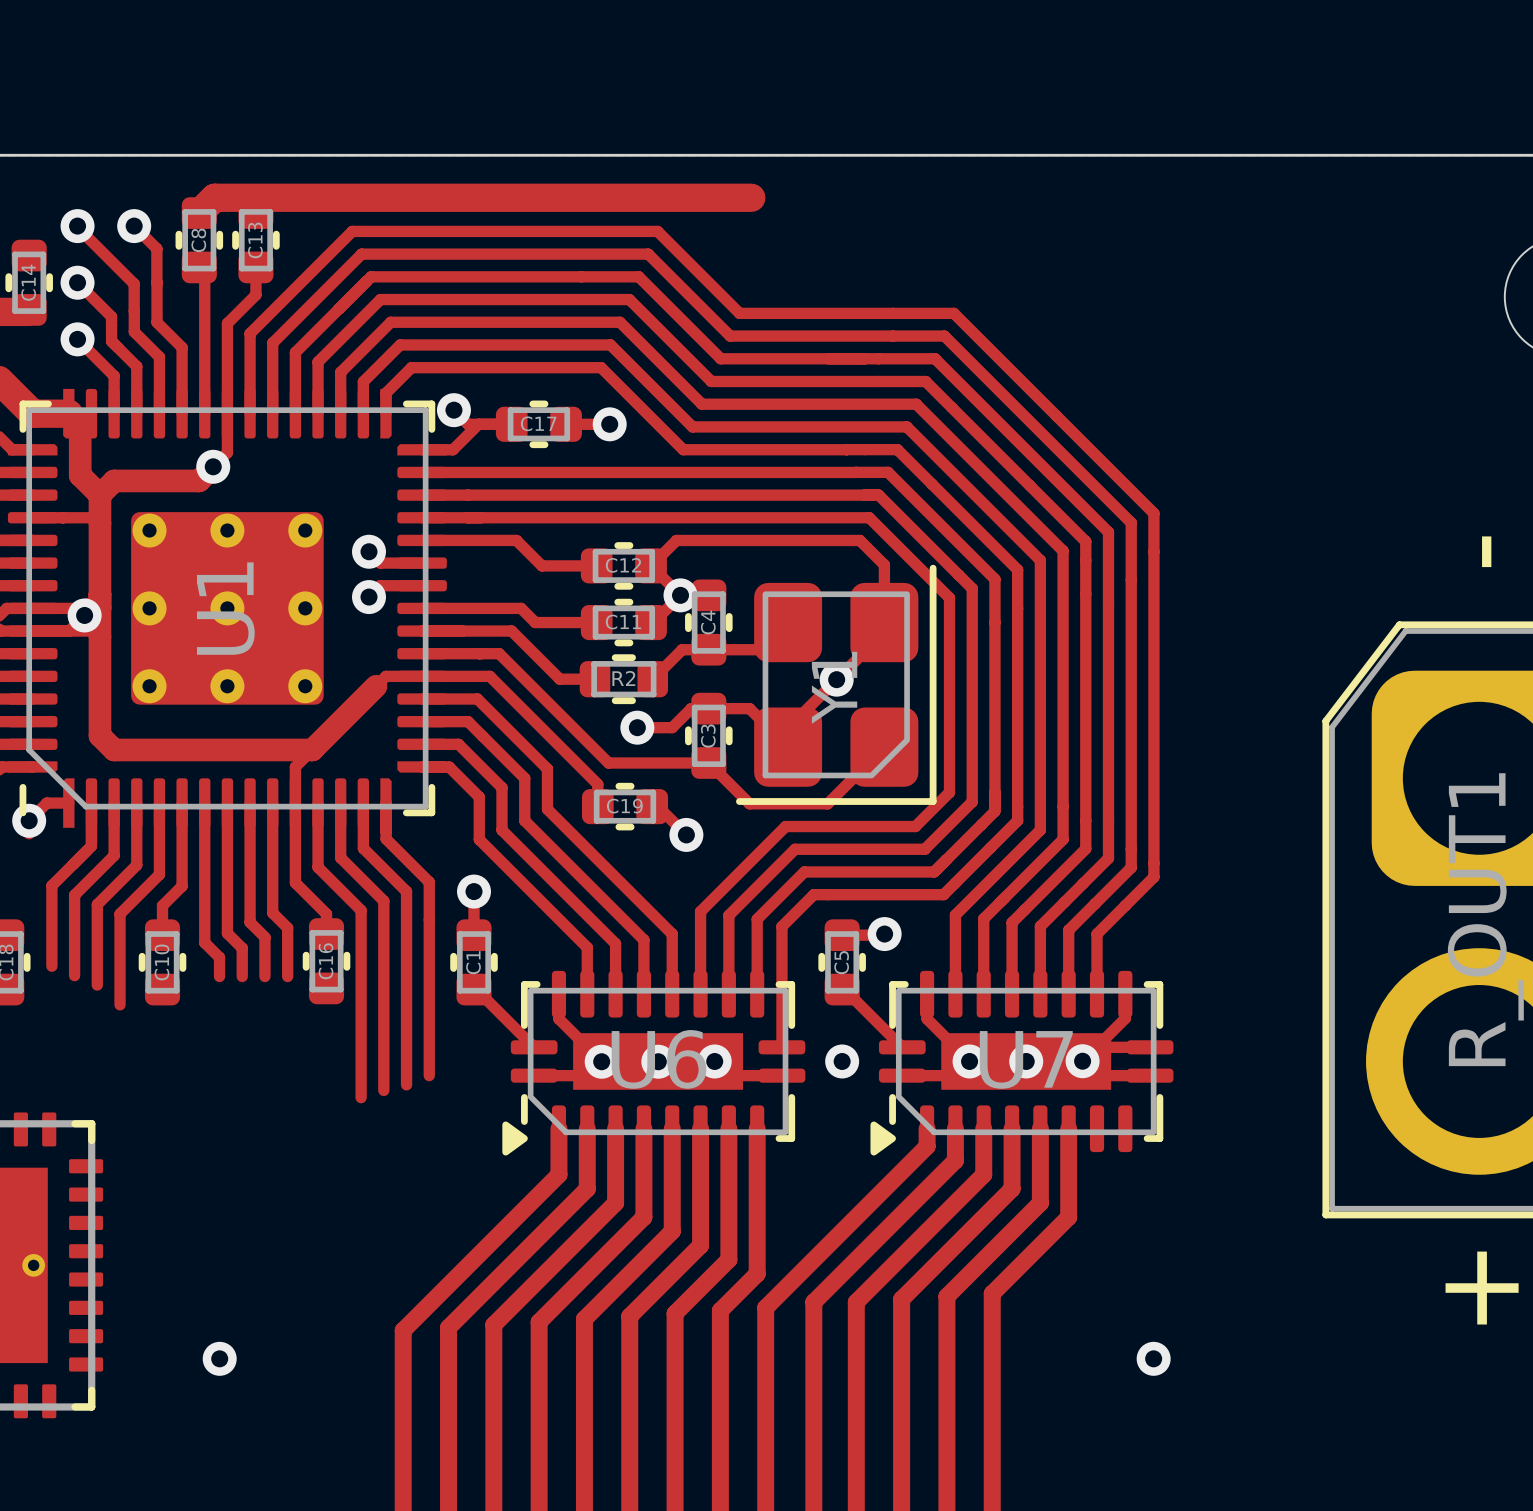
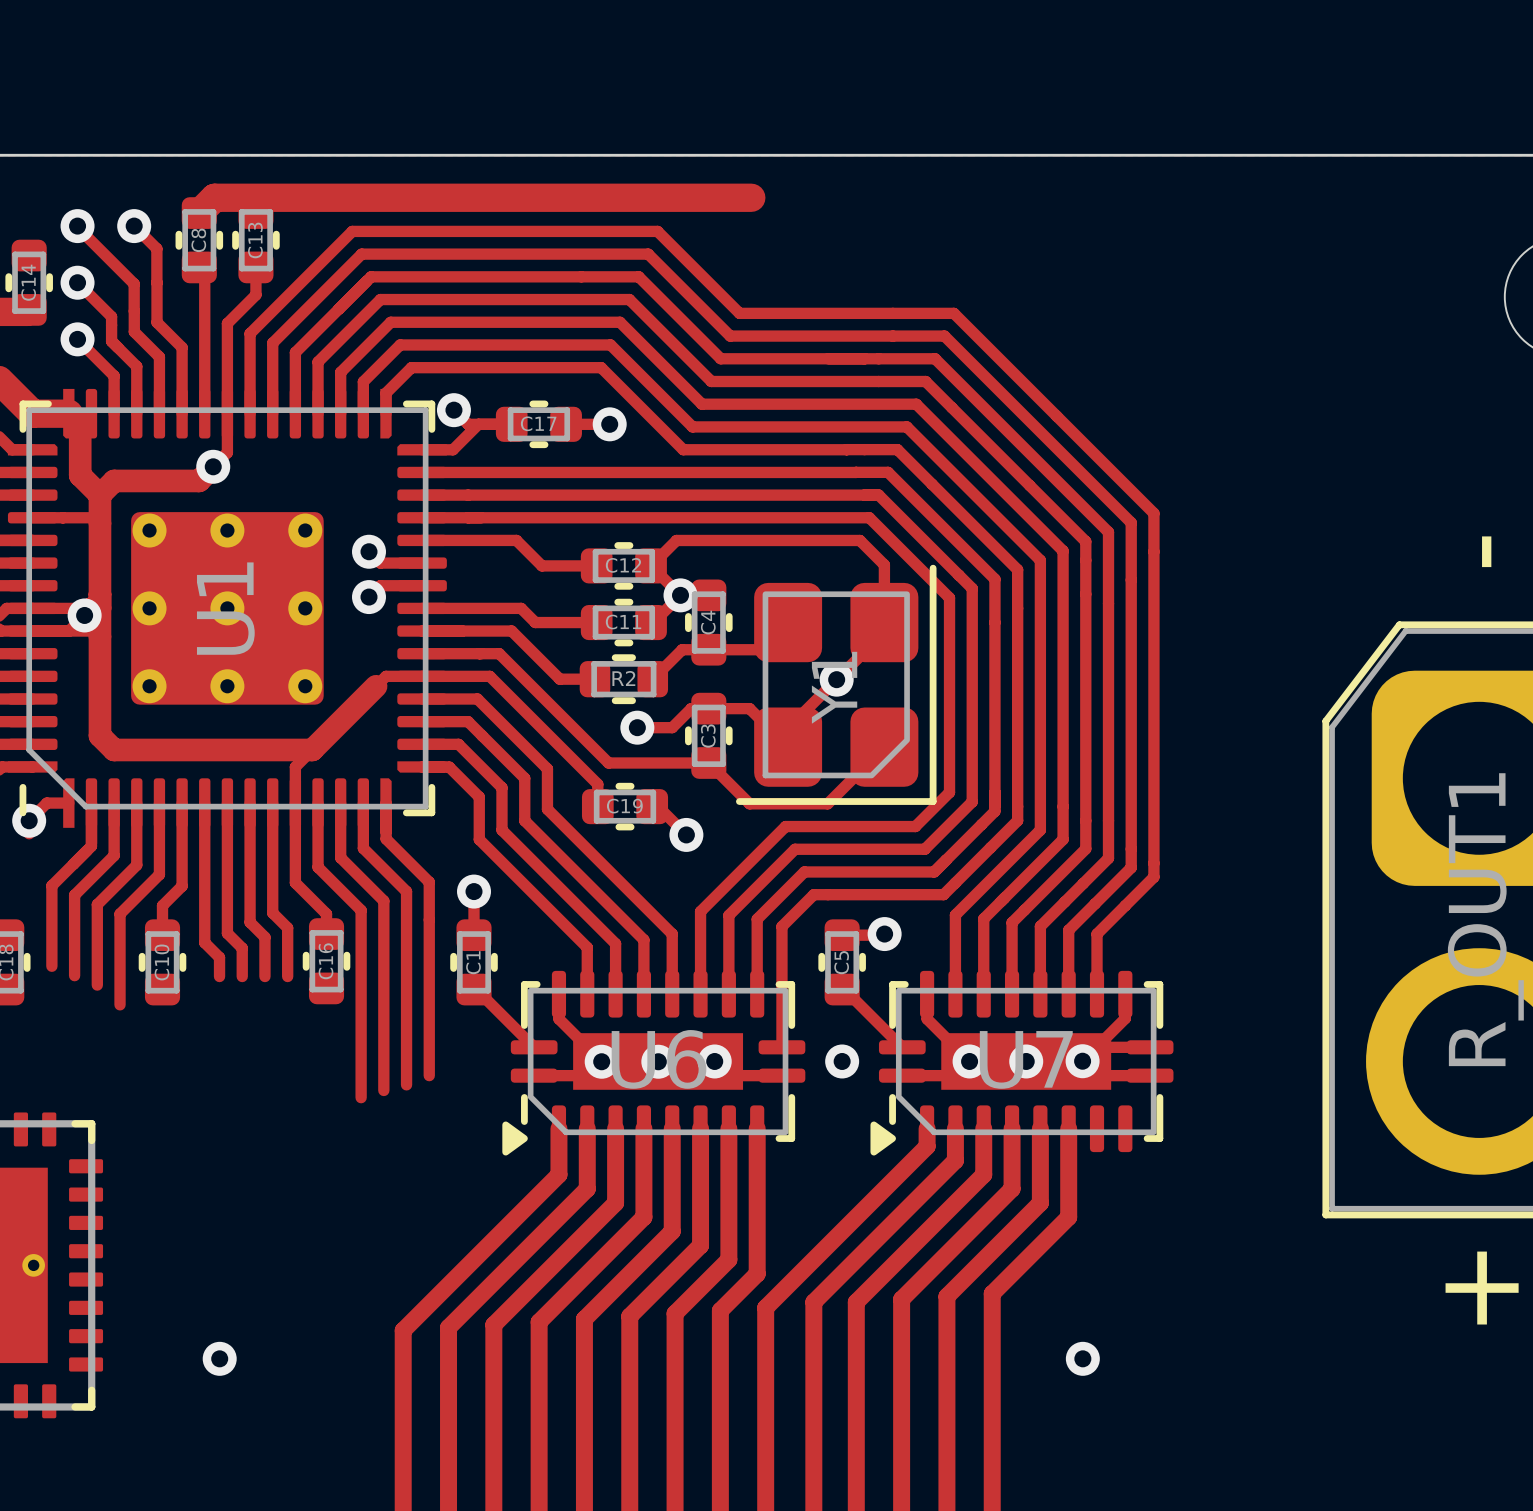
via position: (1153, 1358) -> (1082, 1358)

